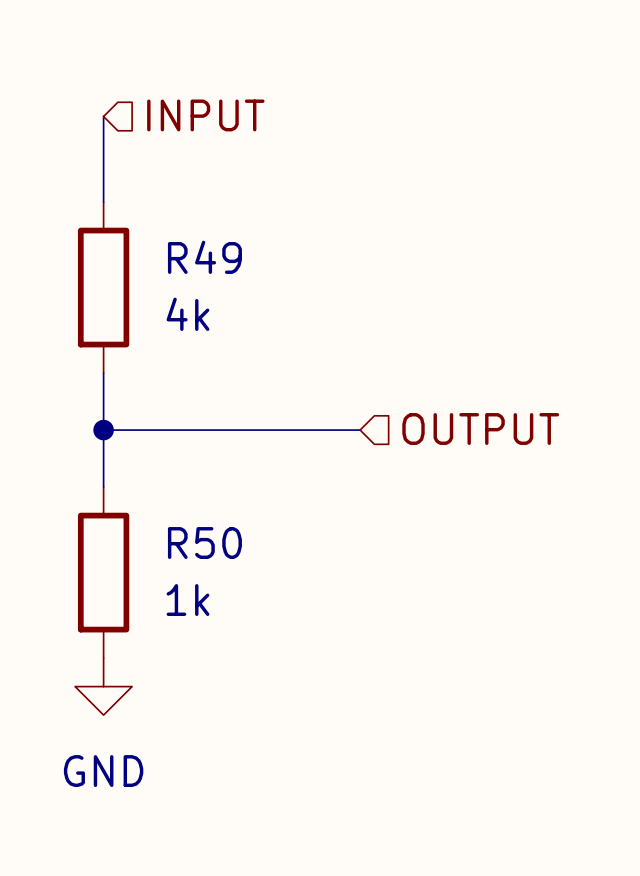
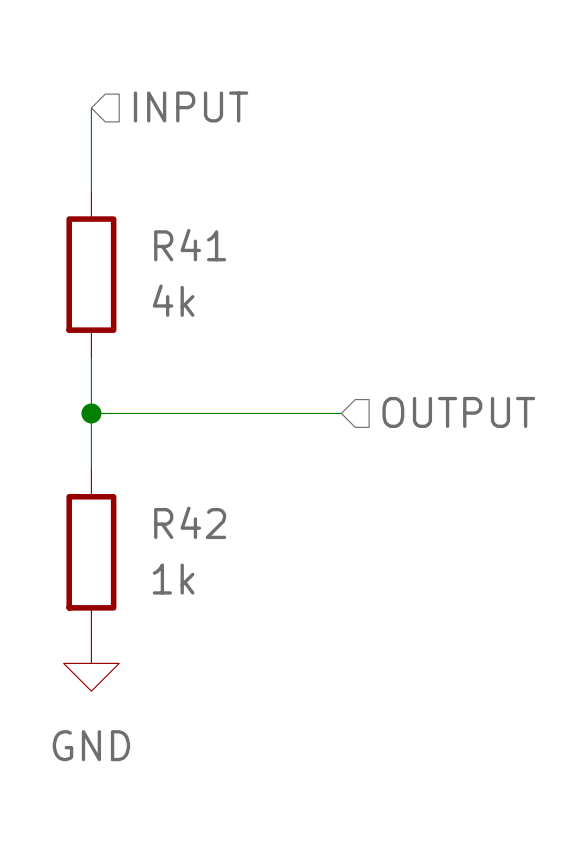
R49 name: R49 (204, 257) -> R41 (190, 245)
R50 name: R50 (204, 543) -> R42 (190, 522)

